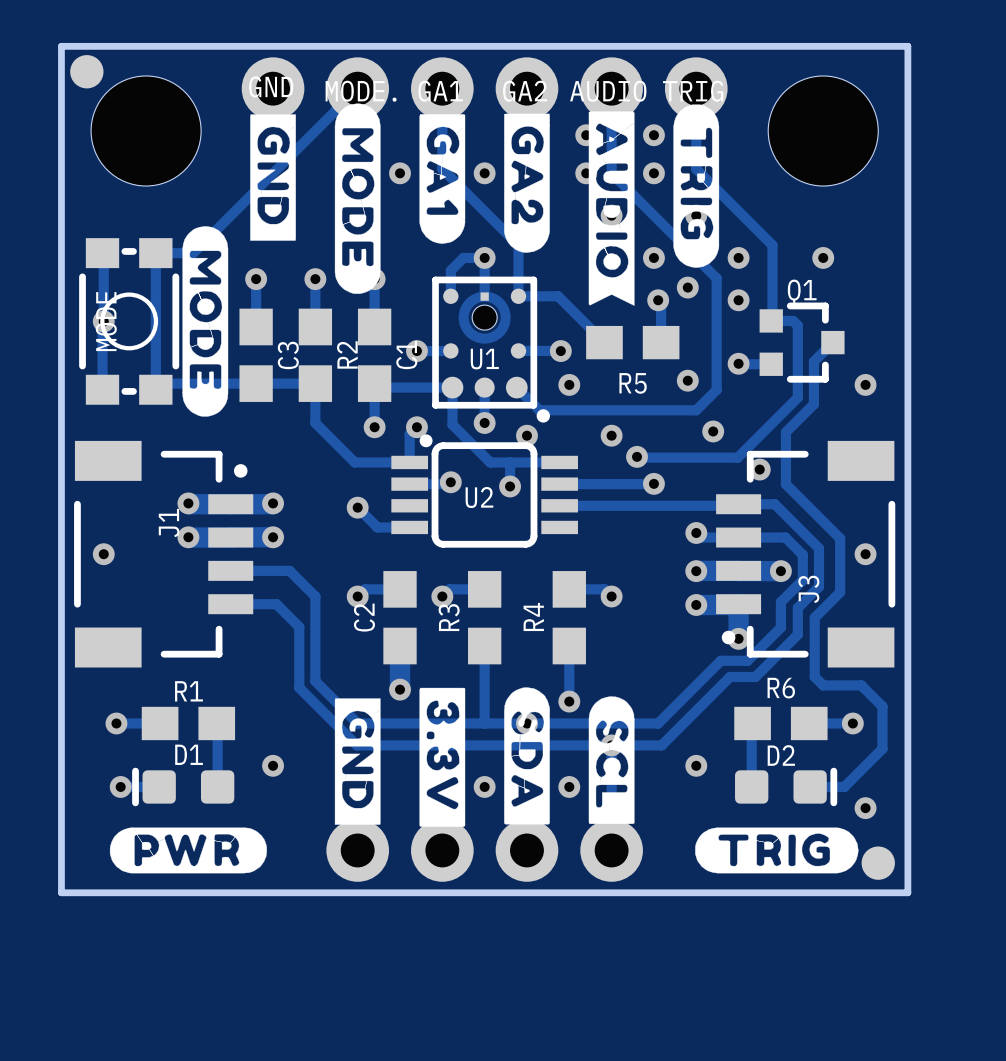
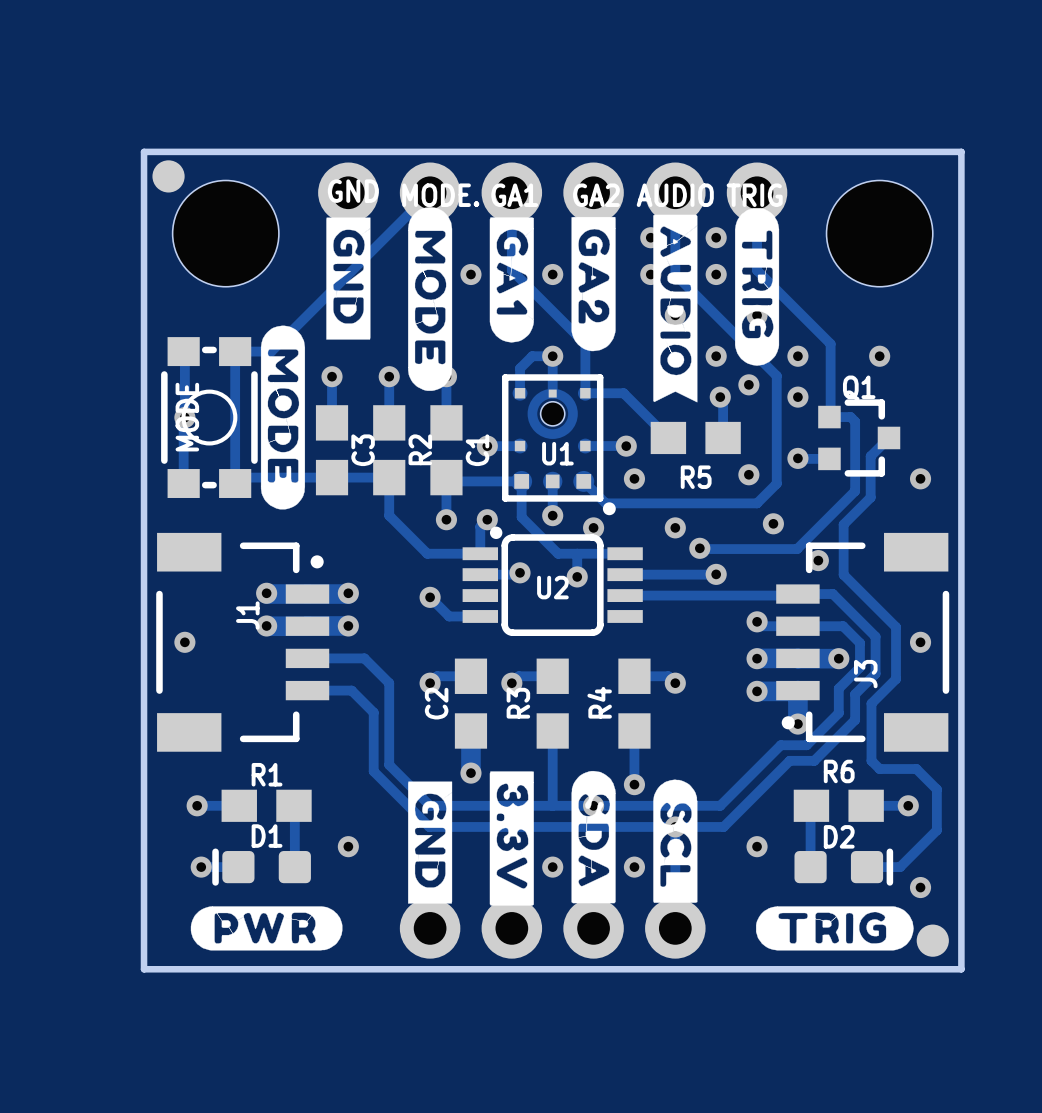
U1 footprint: [432, 276, 550, 423] -> [502, 374, 616, 516]

